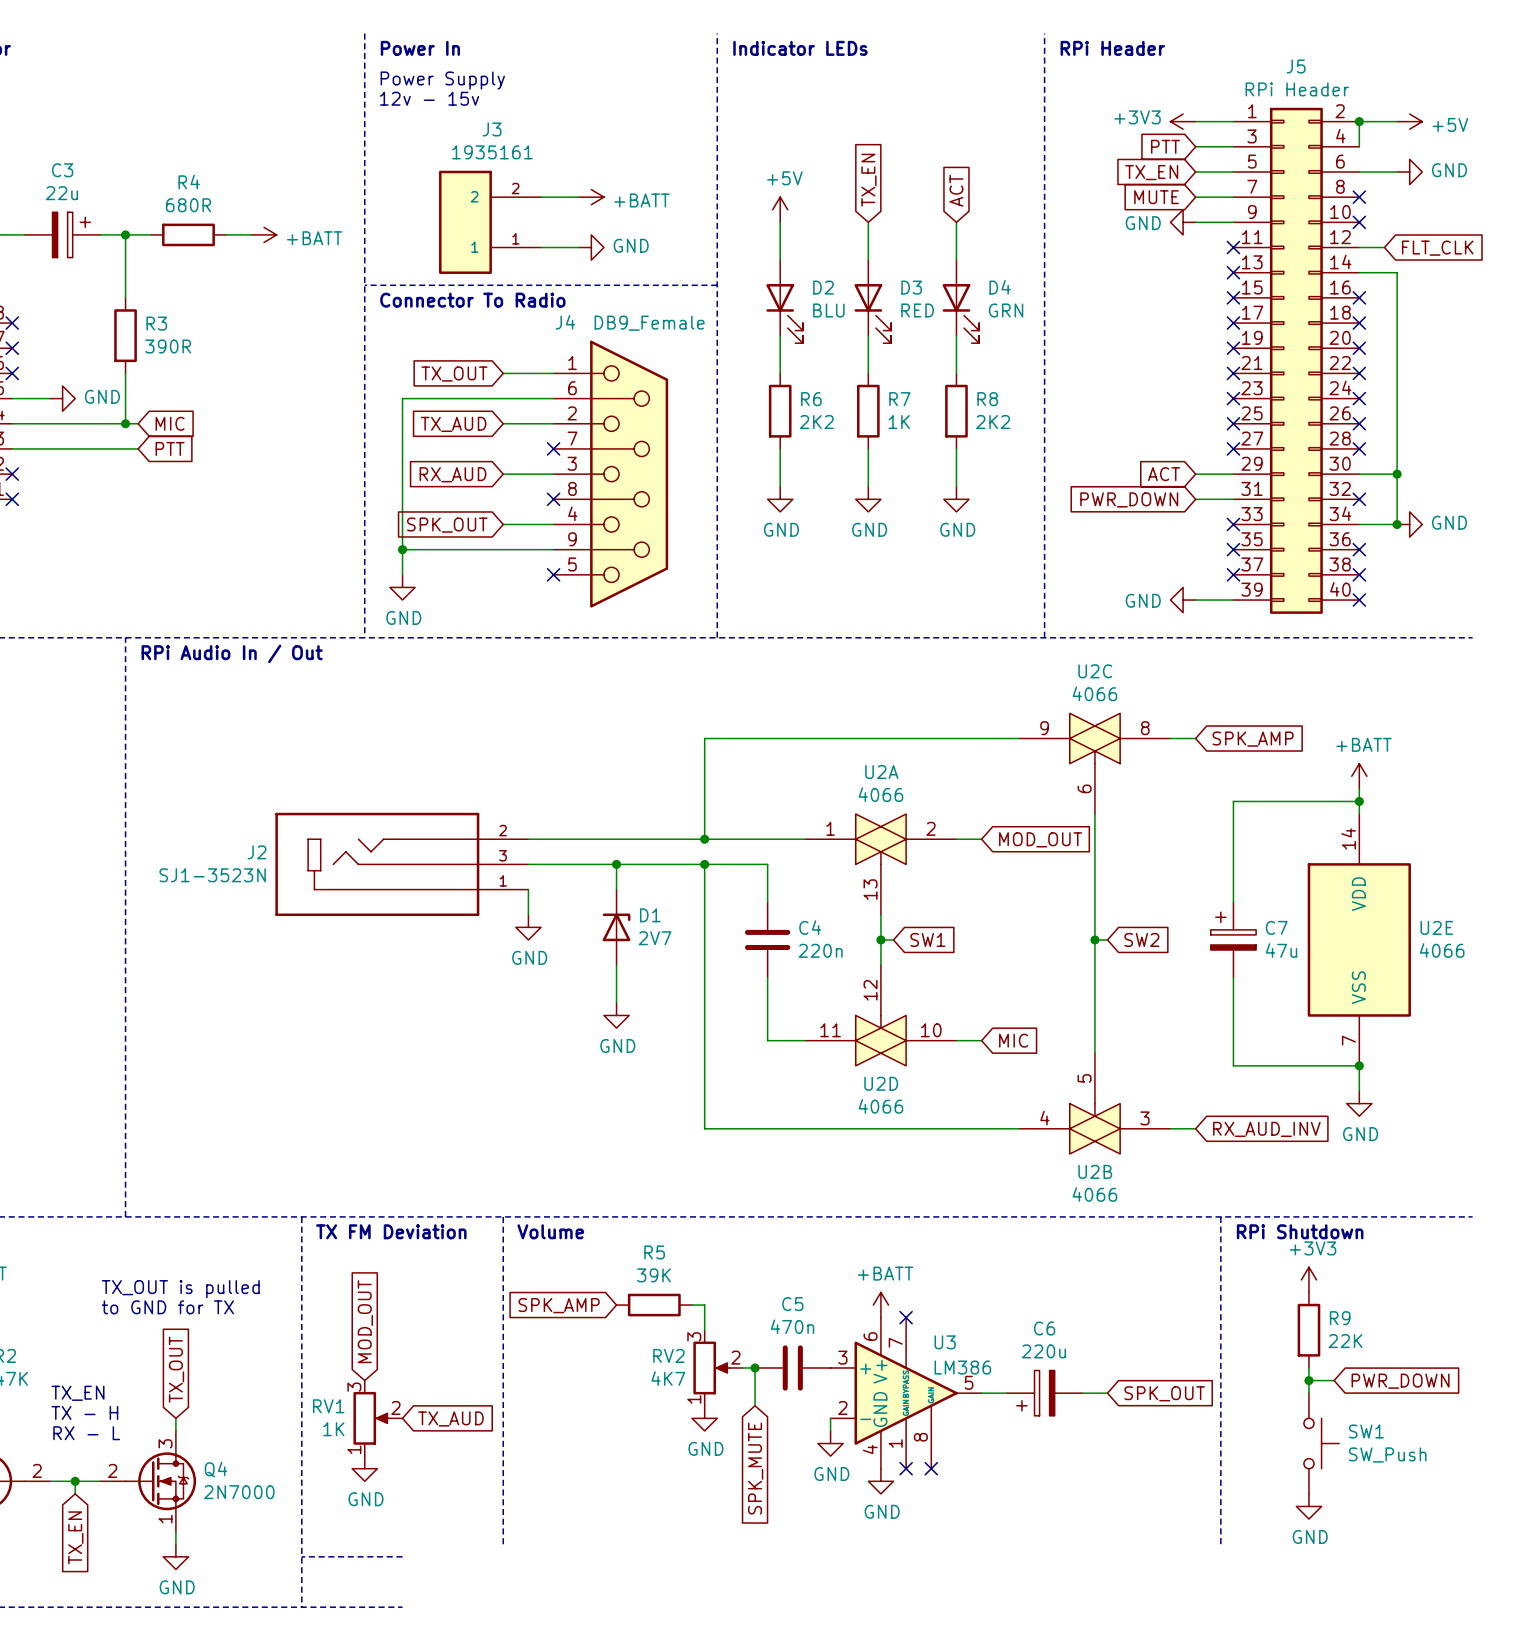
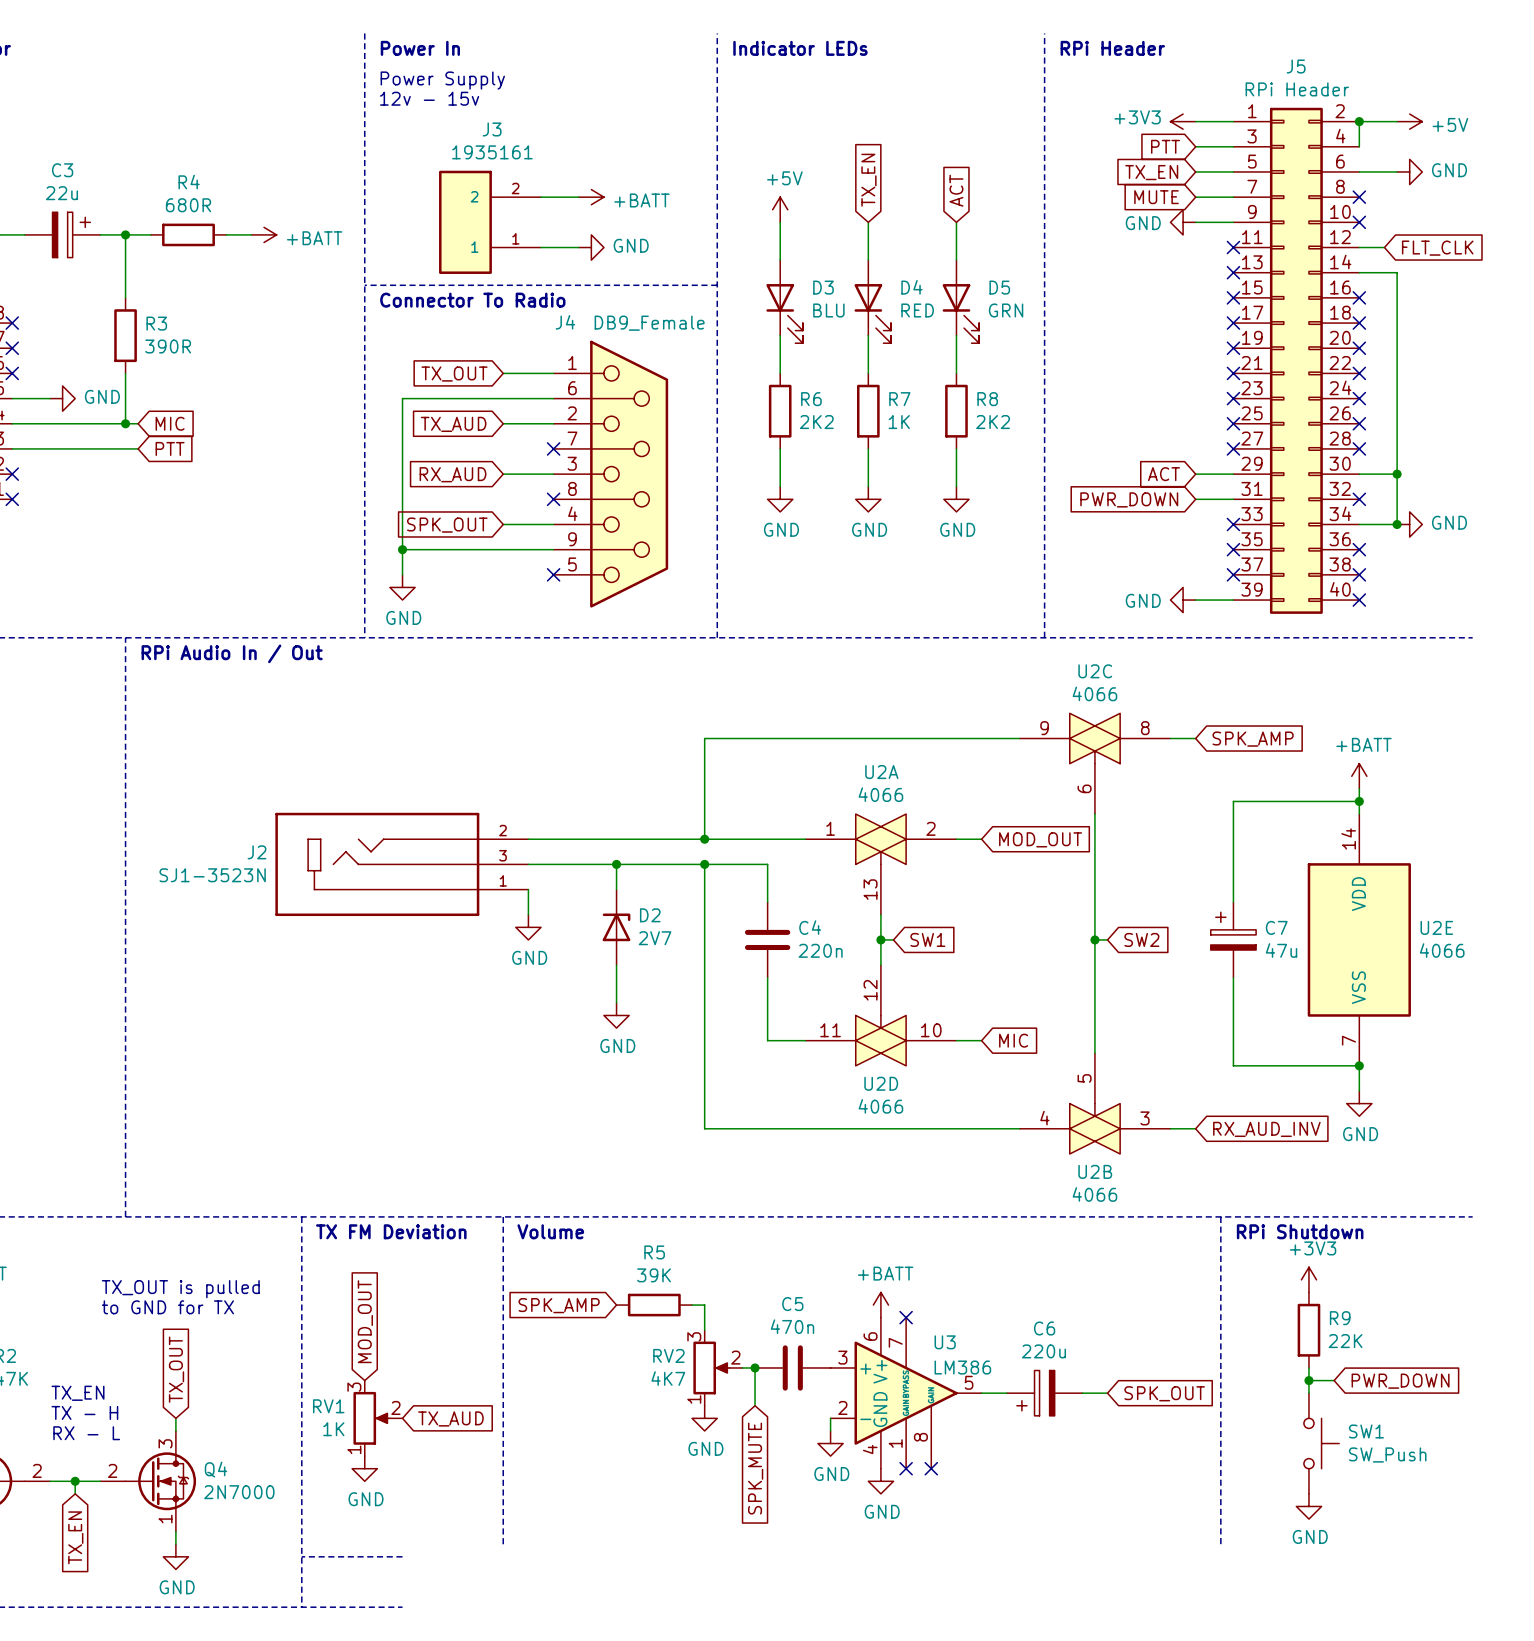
D2 name: D2 (823, 287) -> D3 (823, 287)
D3 name: D3 (911, 287) -> D4 (911, 287)
D4 name: D4 (1000, 287) -> D5 (999, 287)
D1 name: D1 (650, 915) -> D2 (650, 915)

